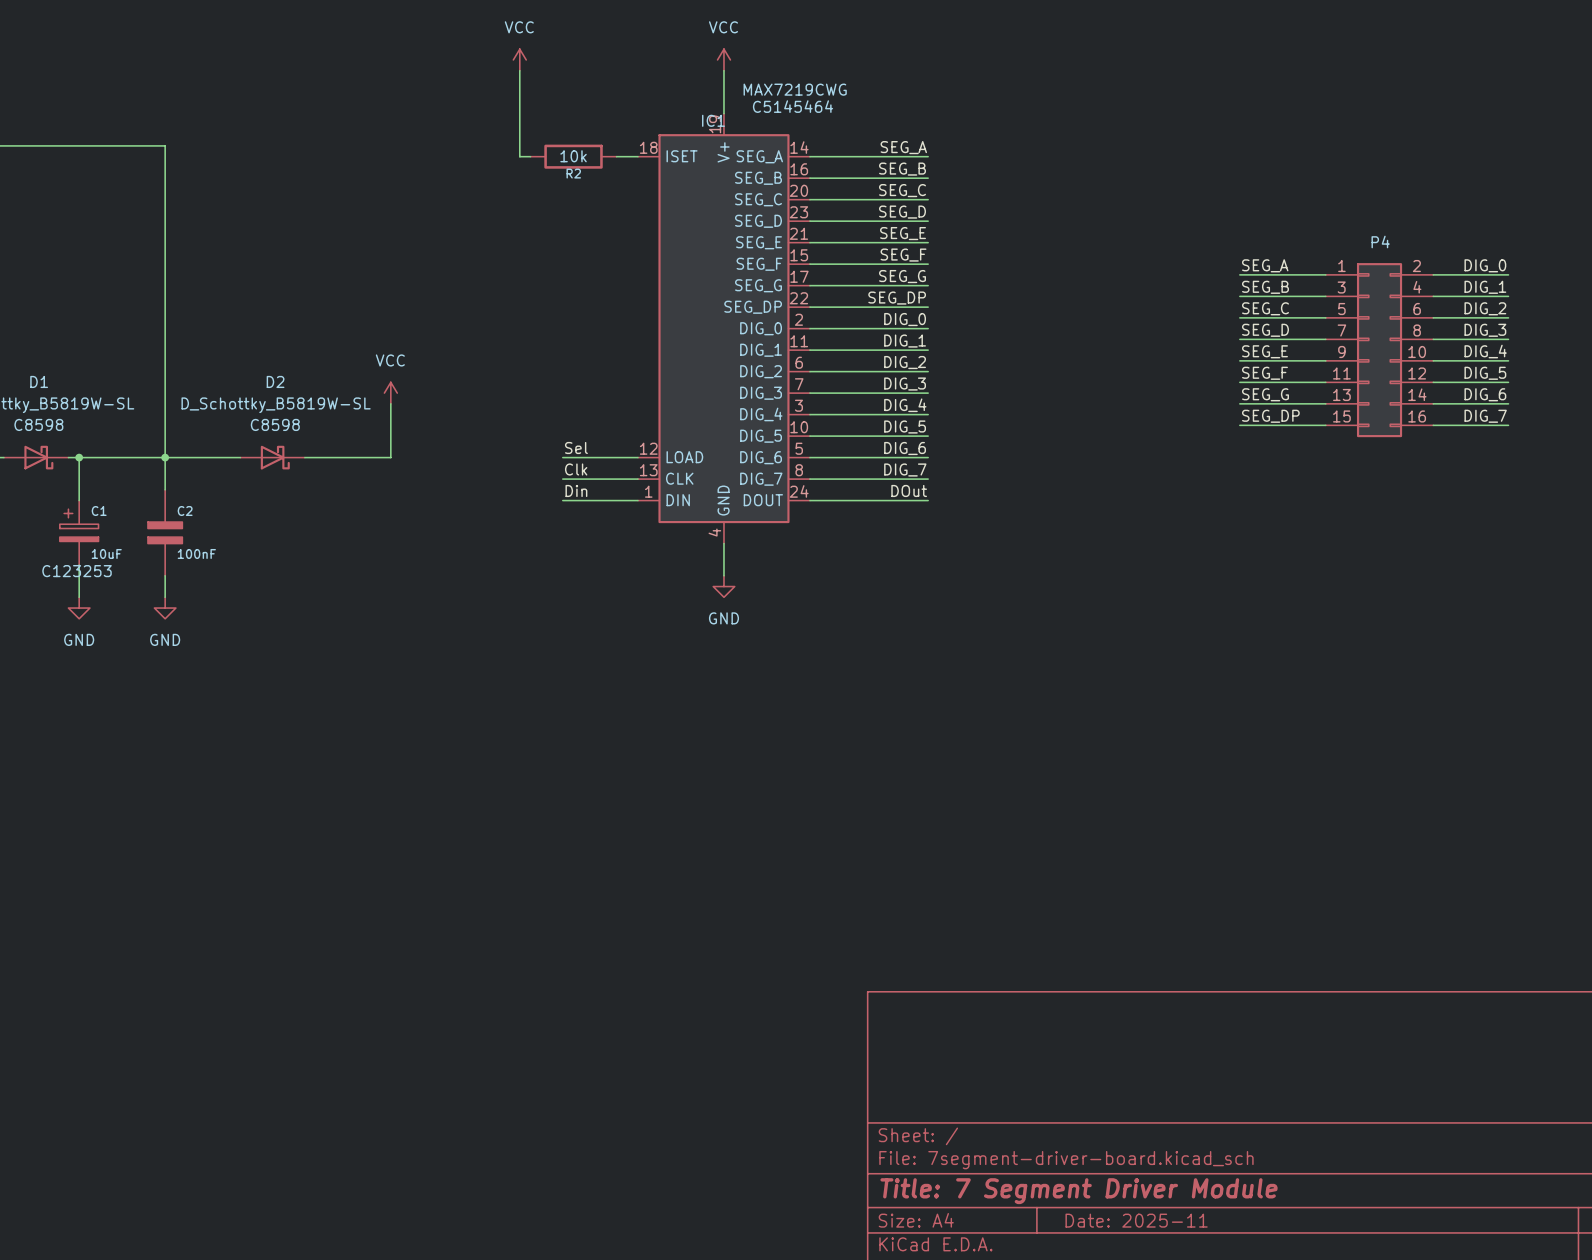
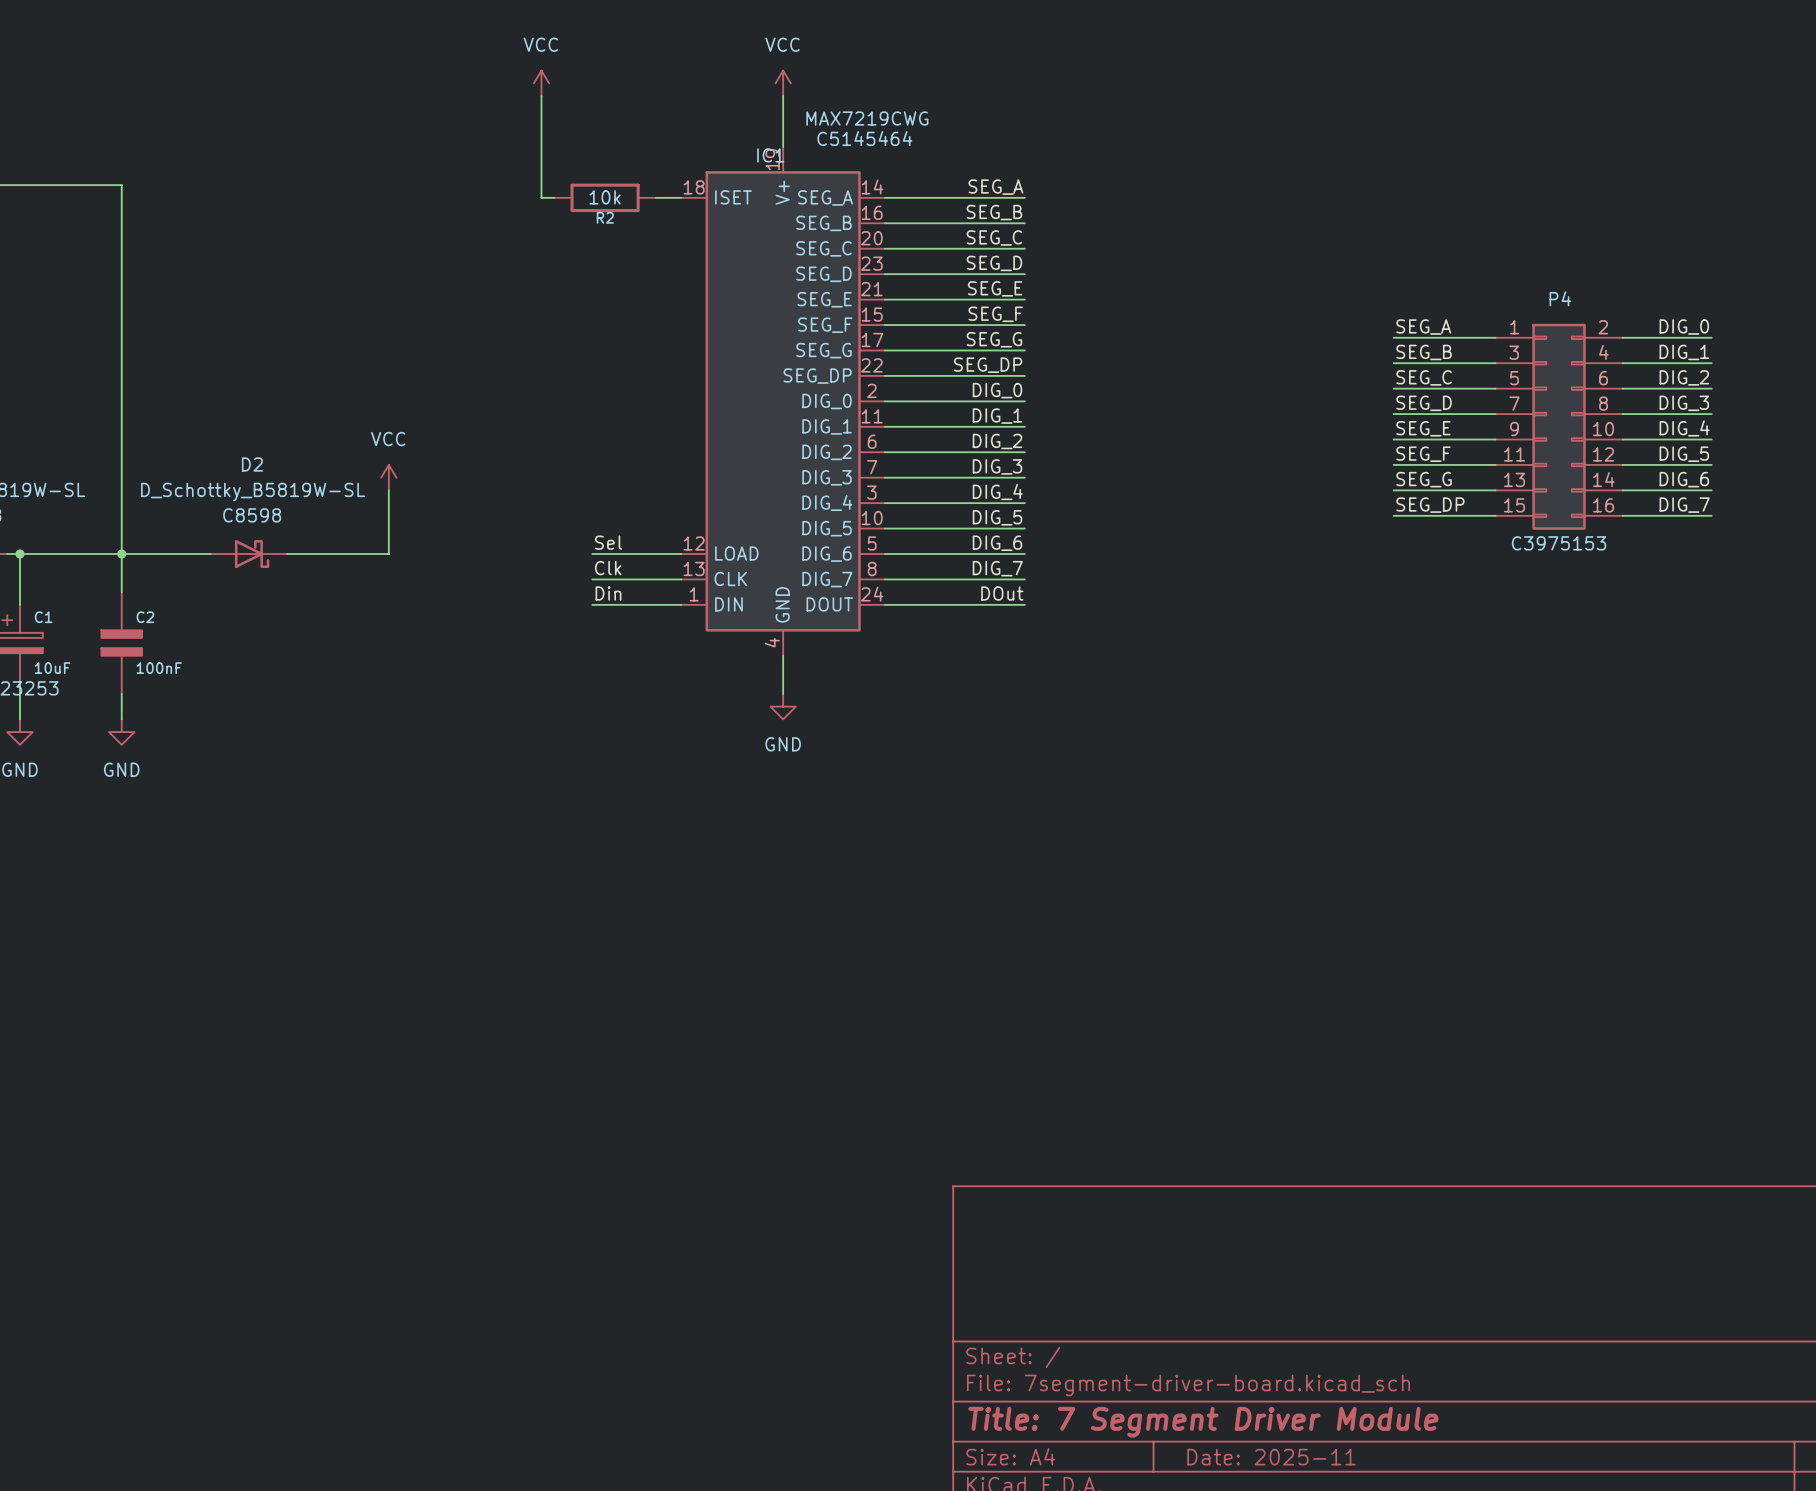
P4 text: none -> C3975153 (1559, 543)

